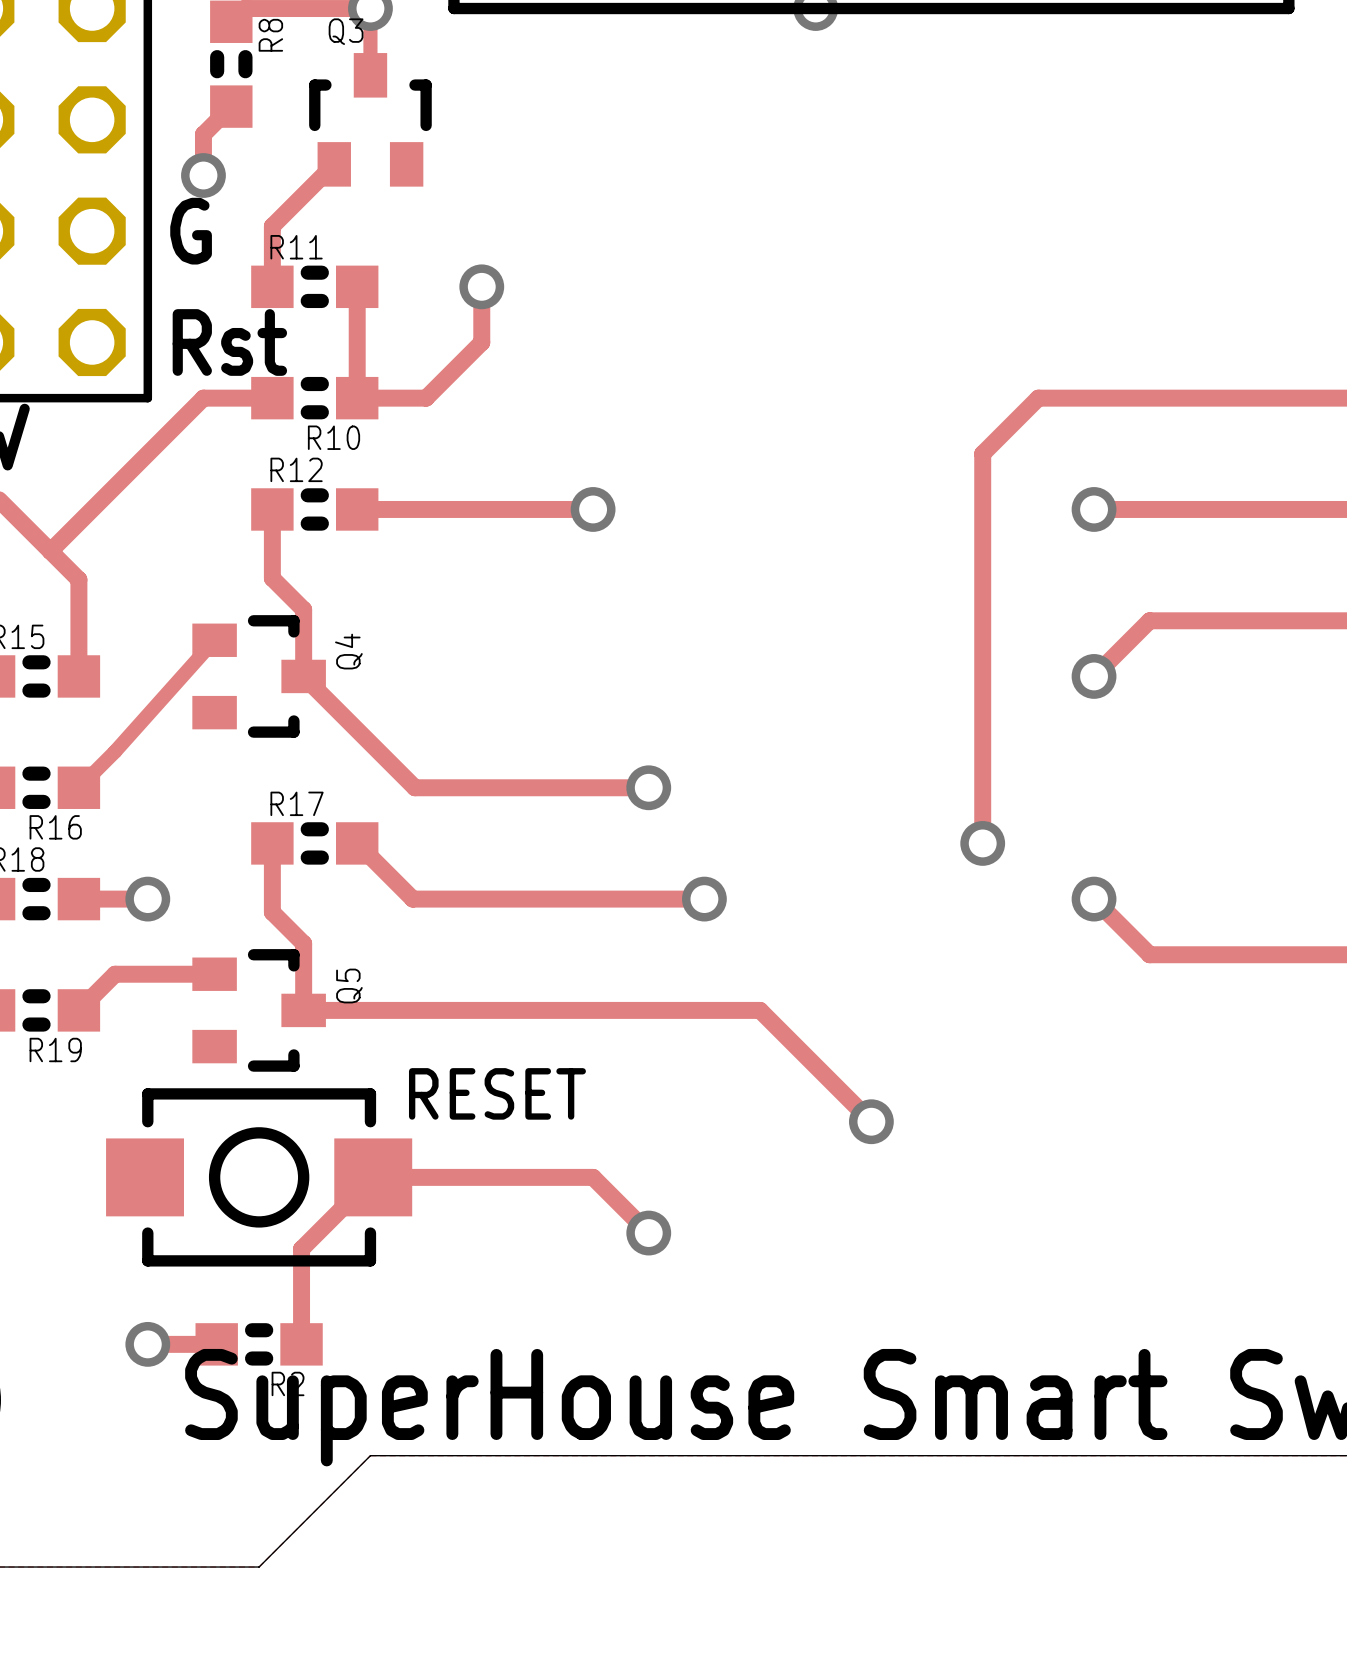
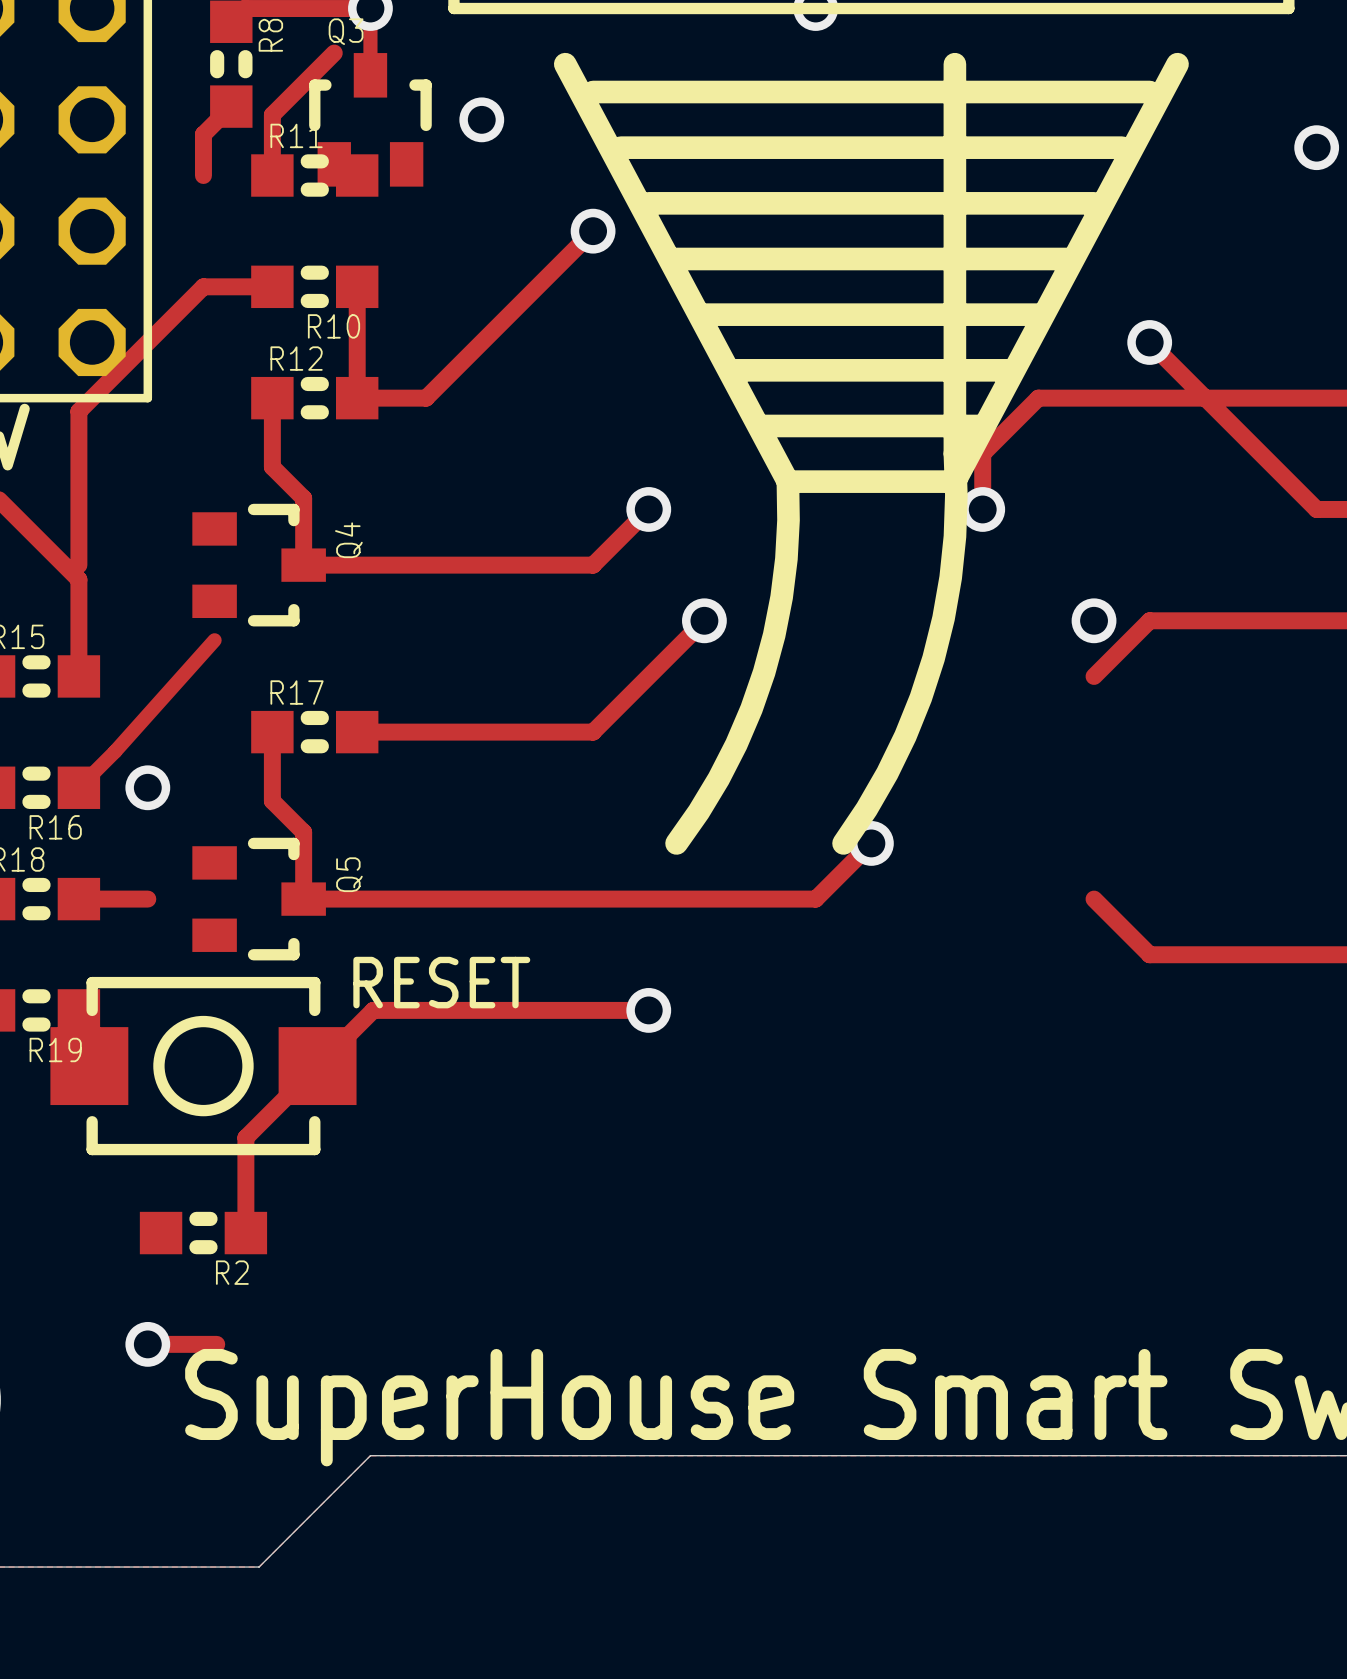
track: none -> (334, 53) (272, 114) (272, 175)
line: none -> (565, 64) (787, 481)
line: none -> (954, 64) (956, 495) (950, 577) (943, 618) (920, 697) (887, 773) (843, 843)
line: none -> (1177, 64) (954, 481) (787, 481)
line: none -> (593, 92) (1149, 92)
via: none -> (481, 119)
line: none -> (620, 147) (1121, 147)
via: none -> (1316, 147)
track: (334, 164) (272, 226) (272, 286) -> (78, 565) (78, 411) (203, 286) (272, 286)
via: (203, 175) -> none
R11: none -> (314, 175)
line: none -> (648, 203) (1094, 203)
text: G (191, 231) -> none
via: none -> (593, 231)
R11 name: R11 (296, 247) -> R10 (334, 326)
line: none -> (676, 258) (1066, 258)
track: (481, 286) (481, 342) -> (593, 231) (481, 342)
via: (481, 286) -> none
line: none -> (704, 314) (1038, 314)
text: Rst (229, 342) -> none
via: none -> (1149, 342)
line: none -> (732, 370) (1010, 370)
track: (272, 398) (203, 398) (50, 551) -> (272, 398) (272, 467) (303, 498) (303, 565) (593, 565) (648, 509)
line: none -> (760, 425) (982, 425)
R10 name: R10 (334, 437) -> R12 (296, 358)
line: none -> (787, 481) (786, 558) (774, 635) (764, 672) (736, 744) (718, 778) (676, 843)
track: (272, 509) (272, 578) (303, 609) (303, 676) (414, 787) (648, 787) -> none
R12: (314, 509) -> none
track: (357, 509) (593, 509) -> none
via position: (593, 509) -> (648, 509)
track: (982, 509) (982, 843) -> none
via: none -> (982, 509)
track: (1094, 509) (1316, 509) -> (1149, 342) (1316, 509)
via: (1094, 509) -> none
track: none -> (704, 620) (593, 732) (357, 732)
via: none -> (704, 620)
via: none -> (1094, 620)
Q4 position: (259, 676) -> (259, 565)
via: (1094, 676) -> none
via: (648, 787) -> none
track: (272, 843) (272, 912) (303, 943) (303, 1010) (373, 1010) -> (245, 1233) (245, 1137) (373, 1010)
R17 position: (314, 843) -> (314, 732)
track: (357, 843) (412, 899) -> (272, 732) (272, 801) (303, 832) (303, 899) (412, 899)
track: none -> (871, 843) (815, 899) (704, 899)
via: none -> (871, 843)
via: (982, 843) -> none
via position: (147, 899) -> (147, 787)
via: (704, 899) -> none
via: (1094, 899) -> none
track: (214, 974) (115, 974) (78, 1010) -> none
Q5 position: (259, 1010) -> (259, 899)
track: (648, 1010) (760, 1010) (871, 1121) -> none
via: none -> (648, 1010)
text position: RESET (497, 1093) -> RESET (441, 982)
via: (871, 1121) -> none
part position: (259, 1177) -> (203, 1066)
track: (648, 1233) (593, 1177) (373, 1177) (301, 1249) (301, 1344) -> none
via: (648, 1233) -> none
R2 position: (259, 1344) -> (203, 1233)

